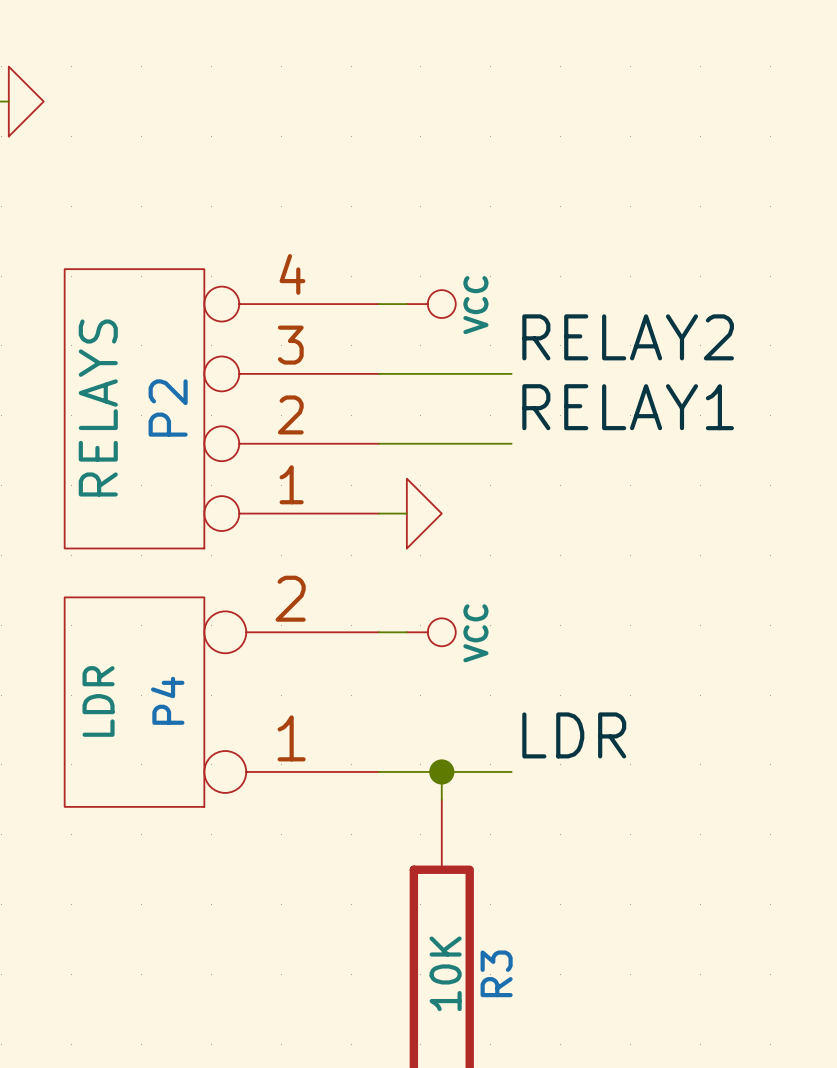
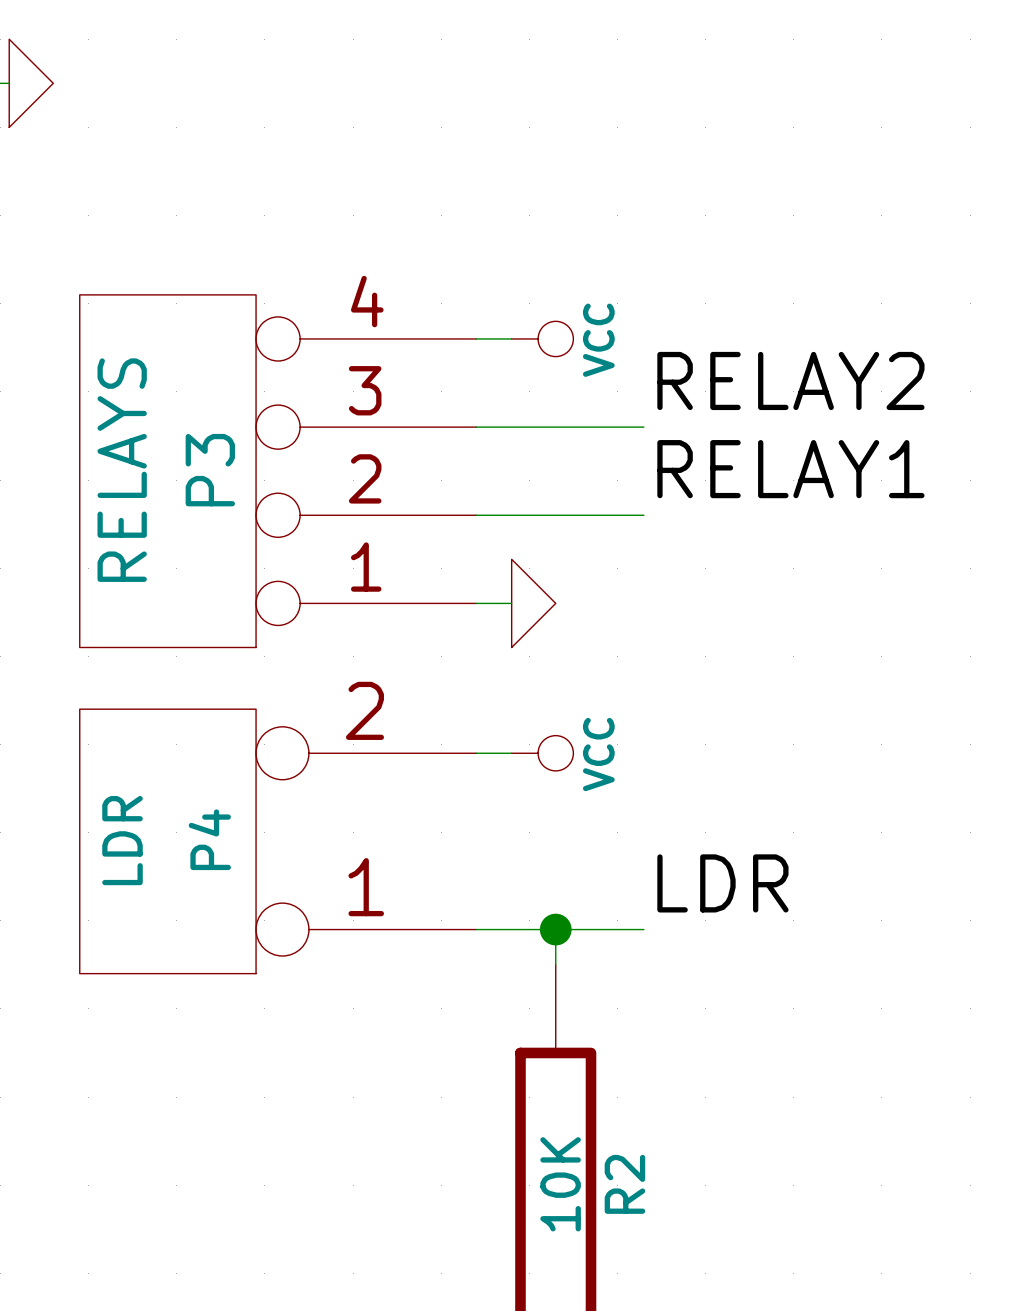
P2 name: P2 (168, 407) -> P3 (210, 470)
R3 name: R3 (496, 973) -> R2 (624, 1184)

